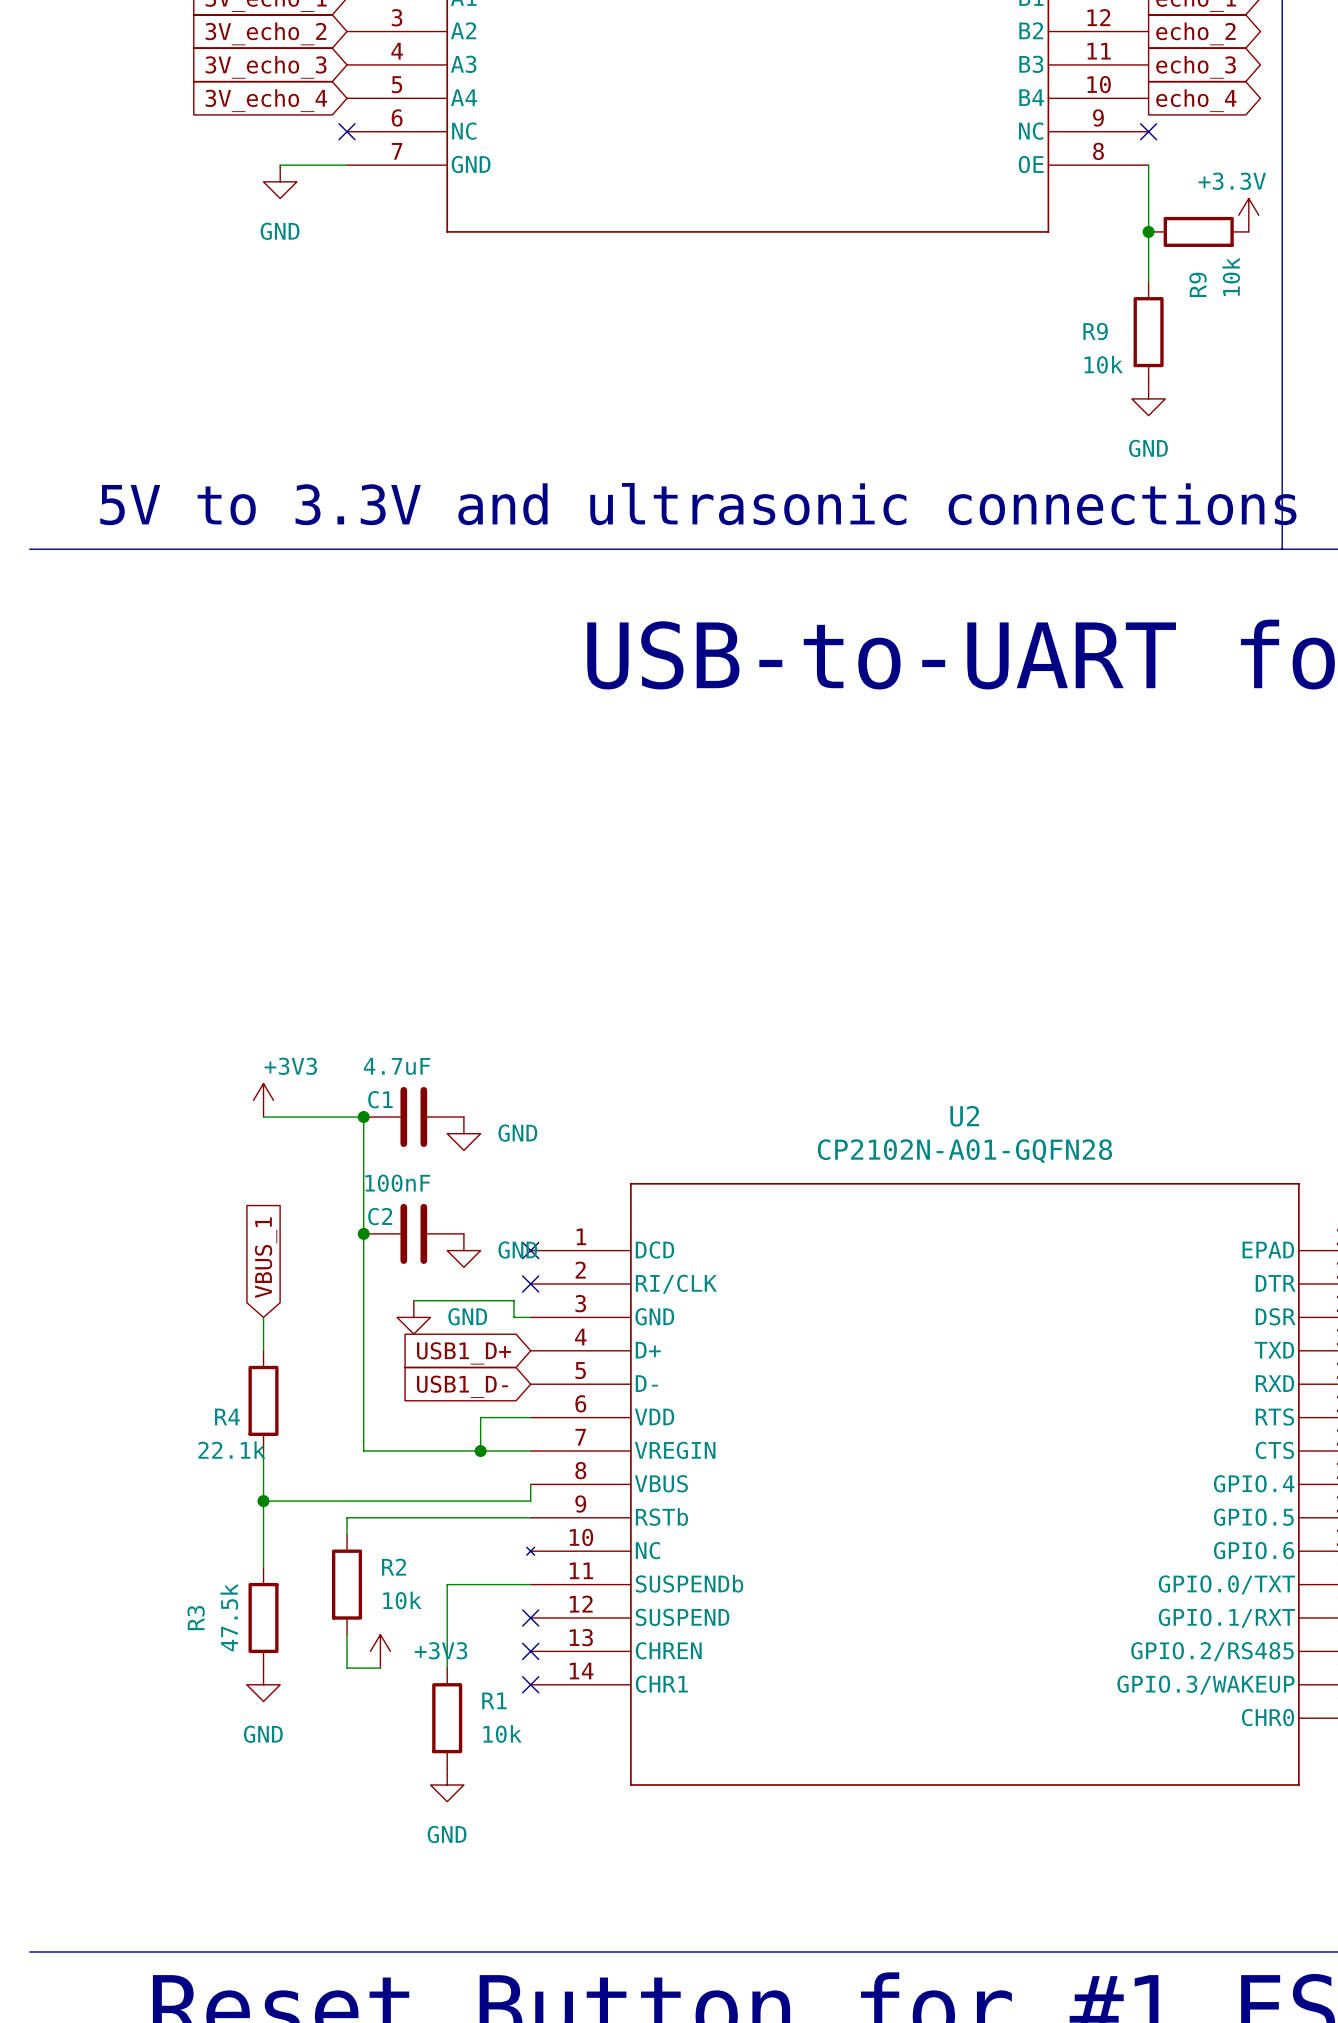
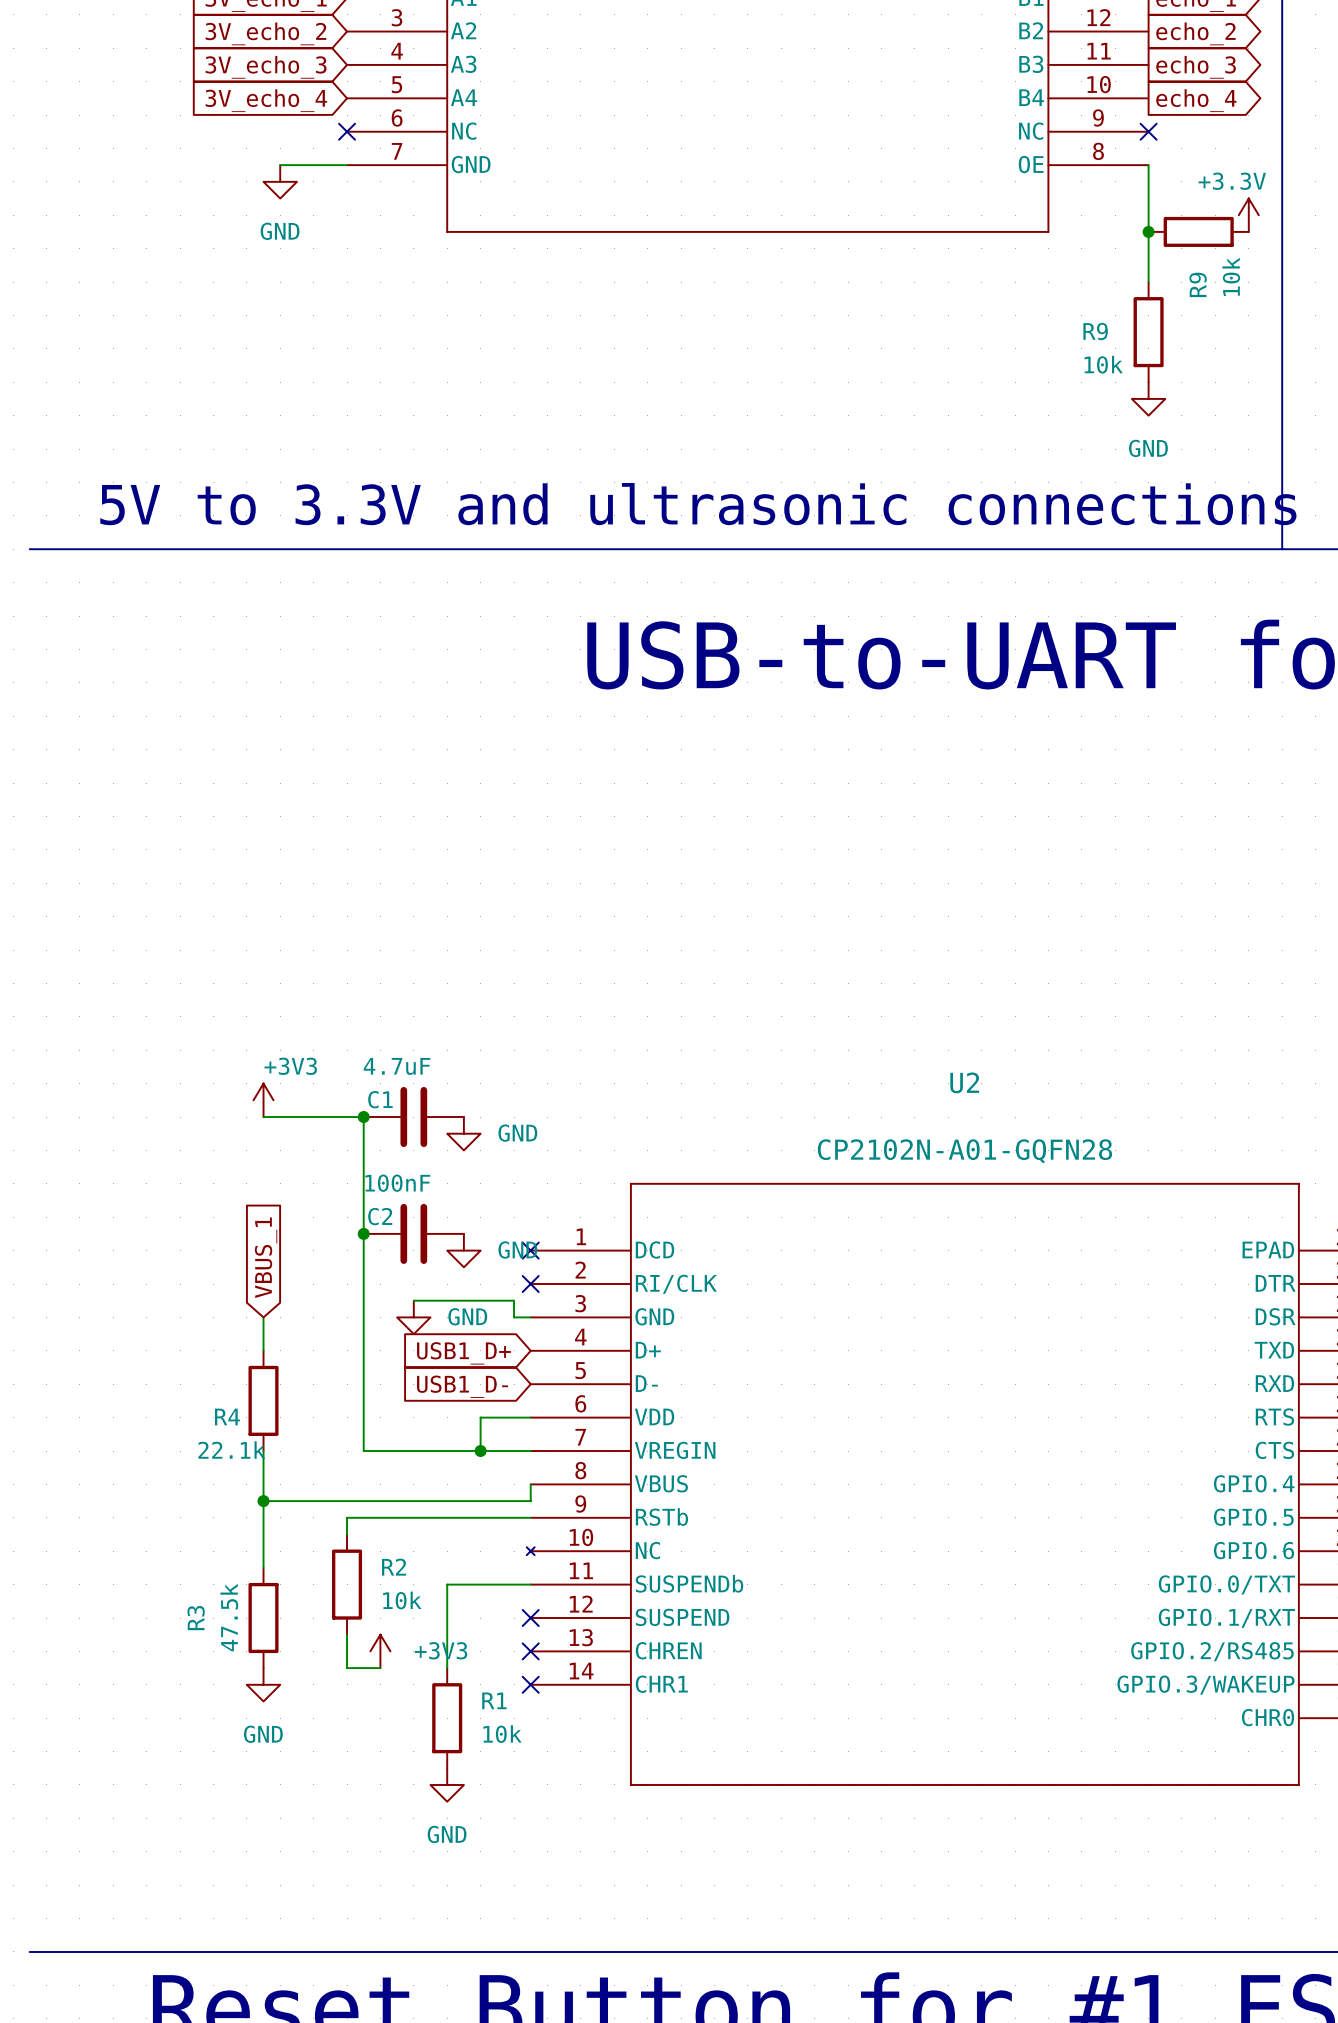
U2 name position: U2 (964, 1116) -> U2 (964, 1082)

